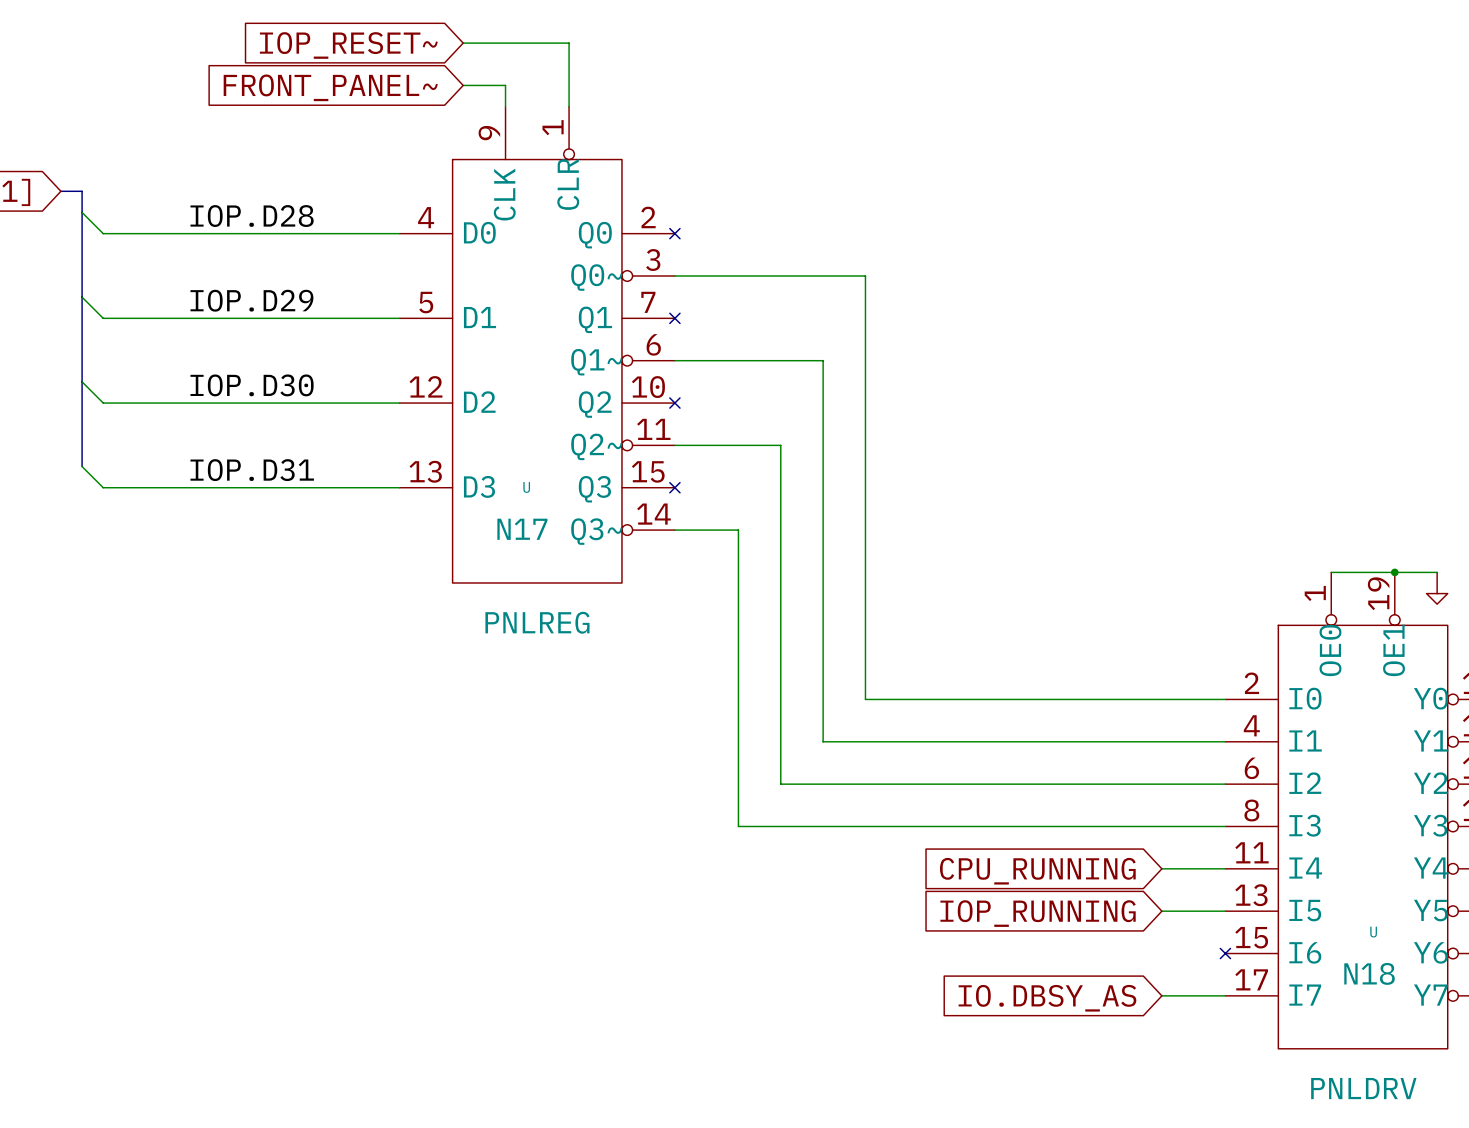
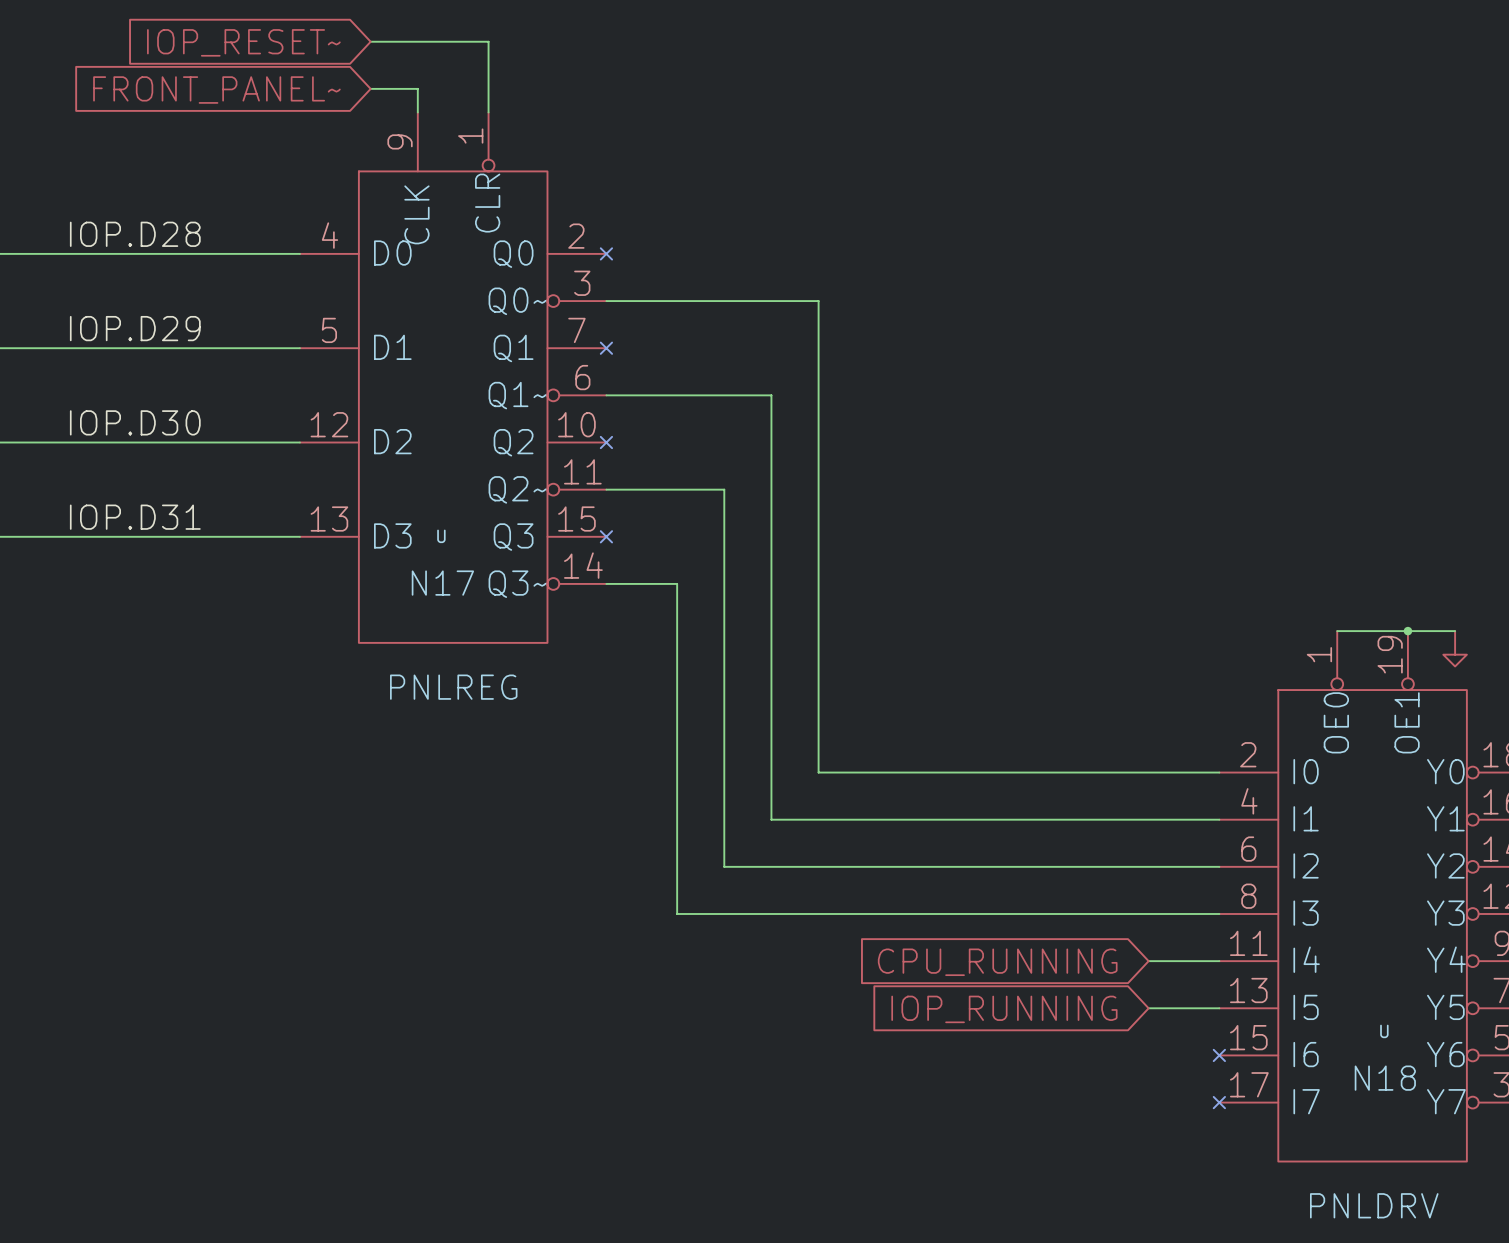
wire: (1161, 995) (1225, 995) -> none
no-connect mark: none -> (1219, 1102)
global label: IO.DBSY_AS (1047, 998) -> none

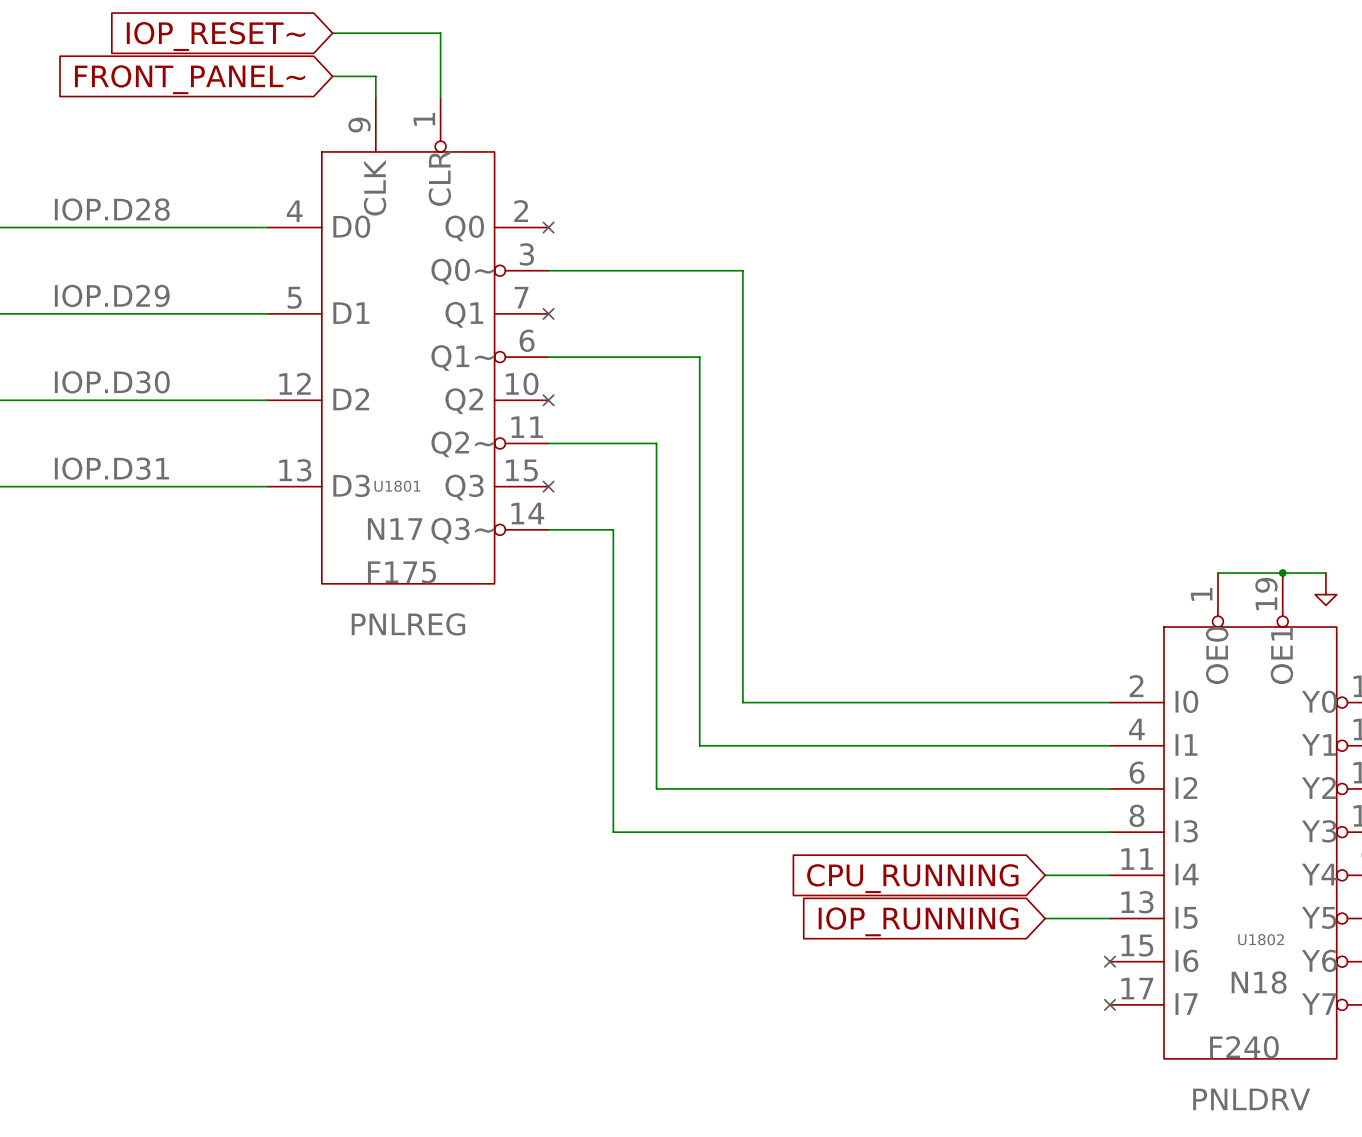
U name: U (441, 536) -> U1801 (397, 486)
U value: none -> F175 (401, 572)
U name: U (1384, 1031) -> U1802 (1261, 939)
U value: none -> F240 (1244, 1047)

